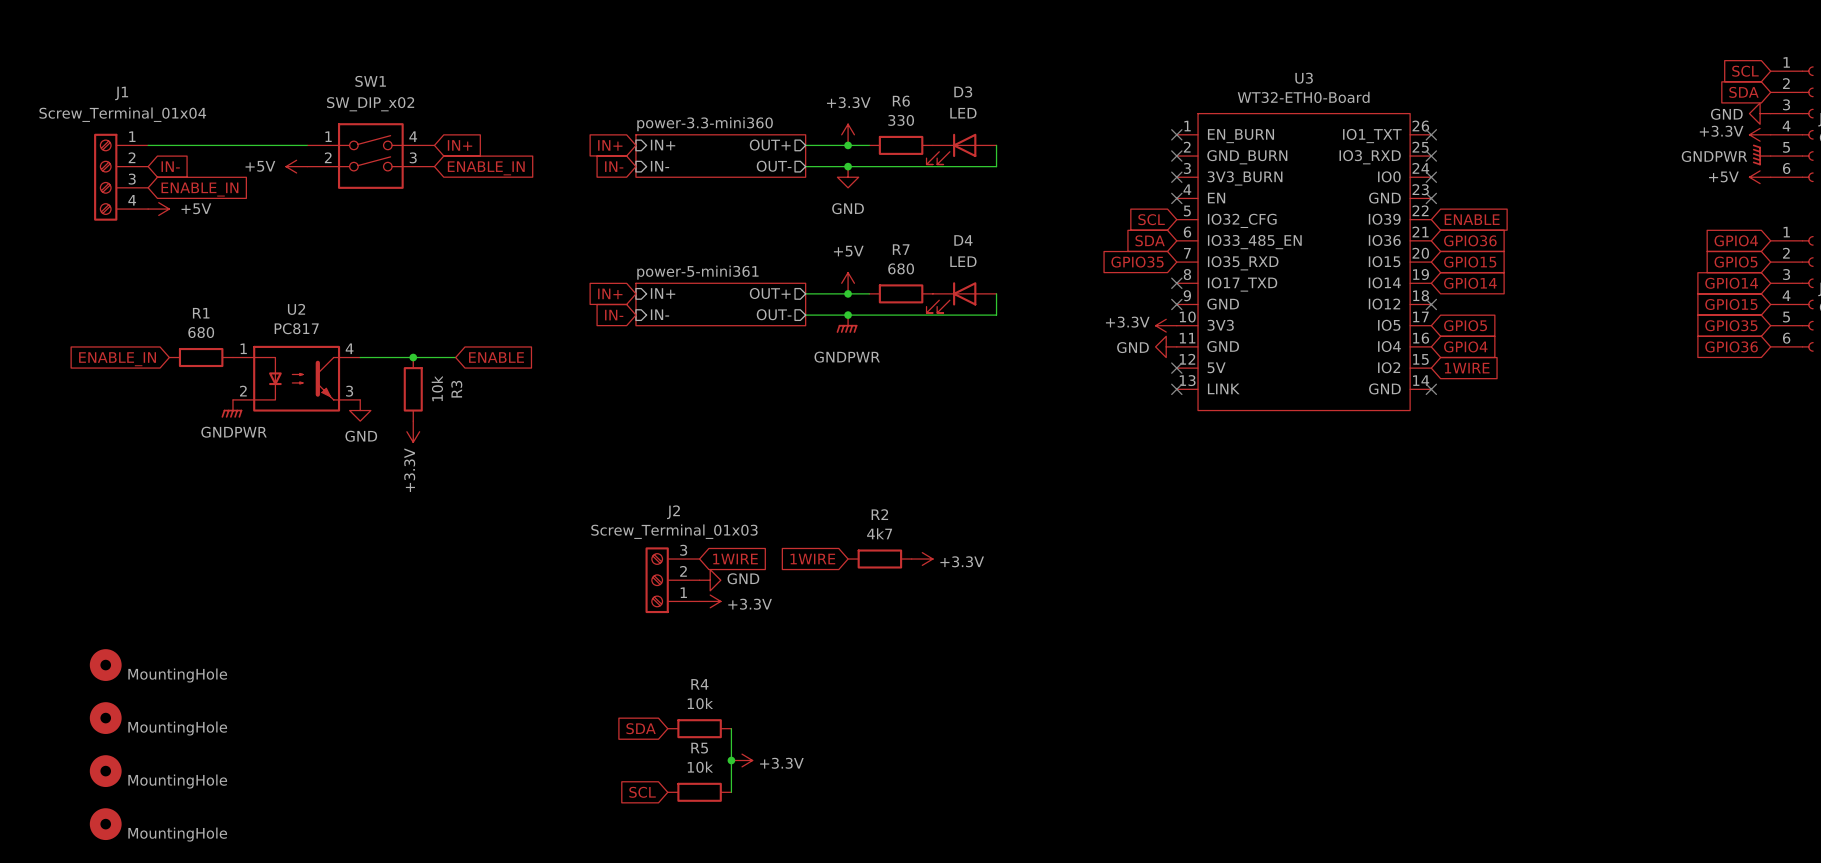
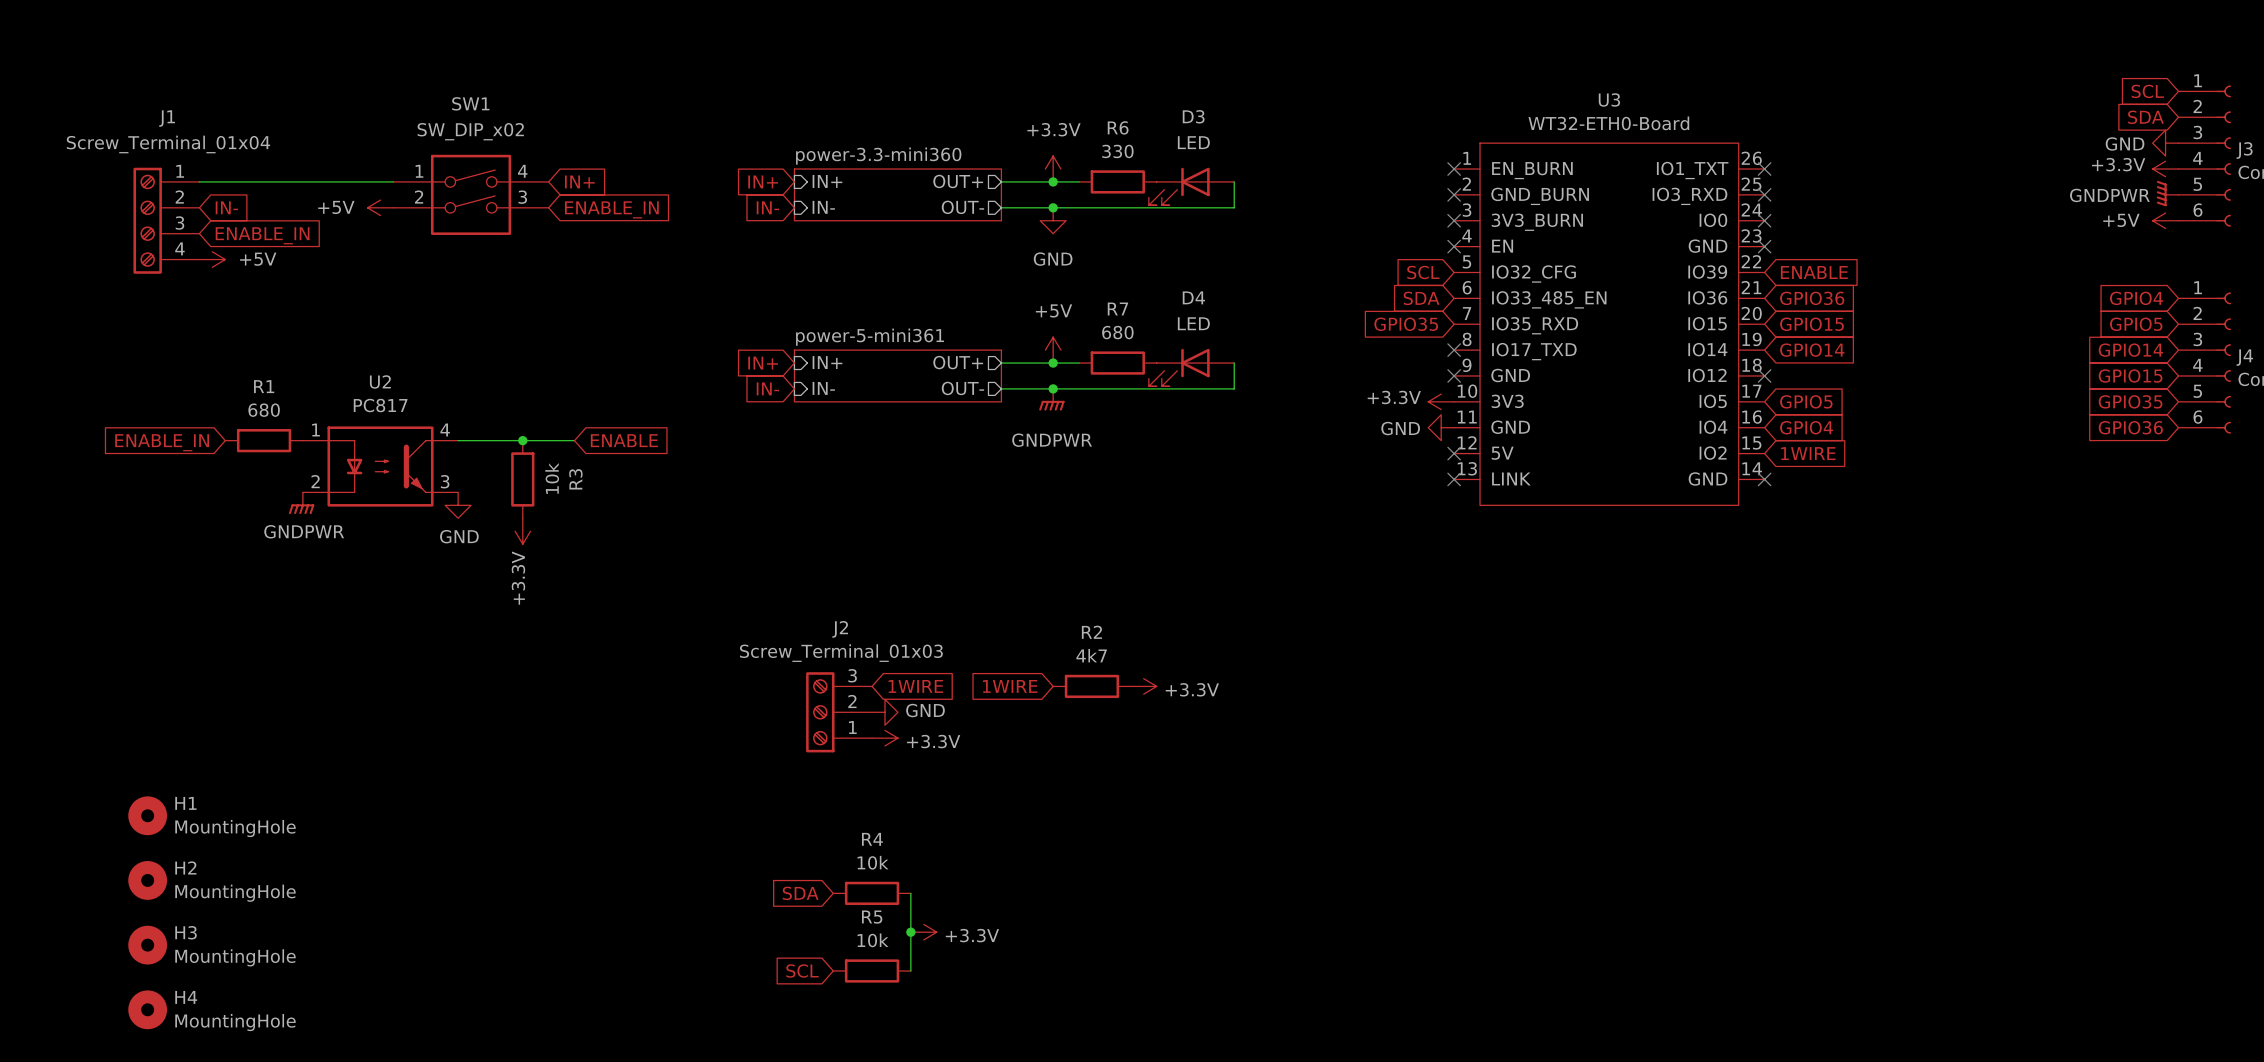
H1 name: none -> H1 (185, 803)
H2 name: none -> H2 (185, 867)
H3 name: none -> H3 (186, 932)
H4 name: none -> H4 (186, 997)

